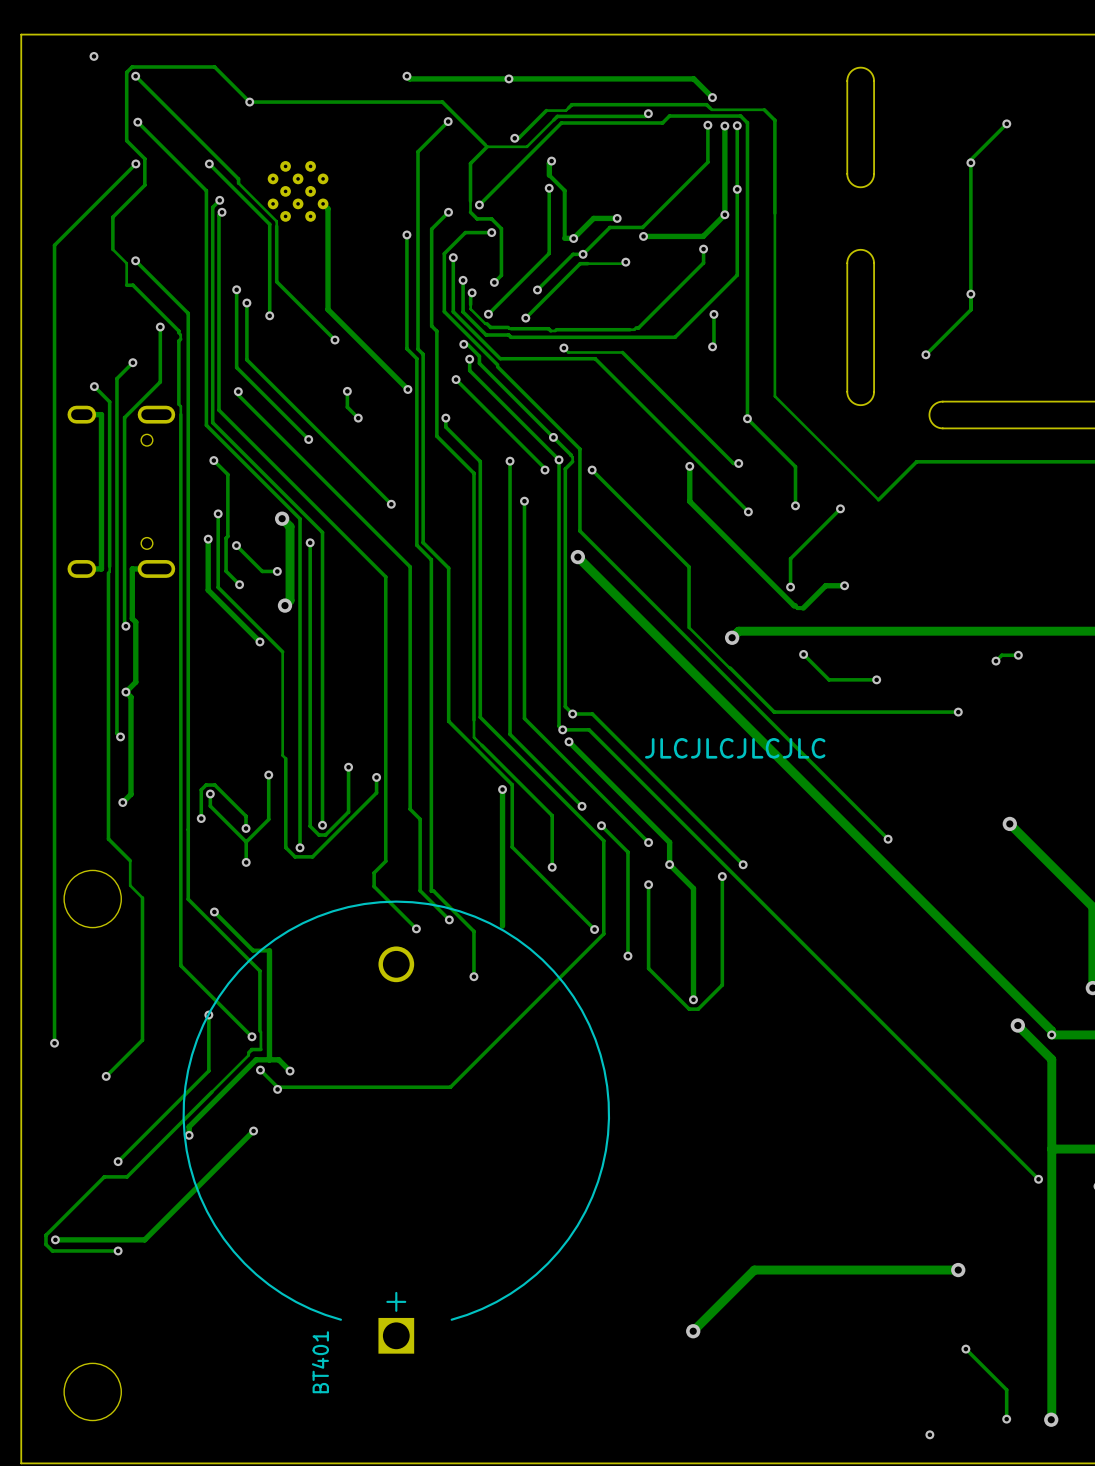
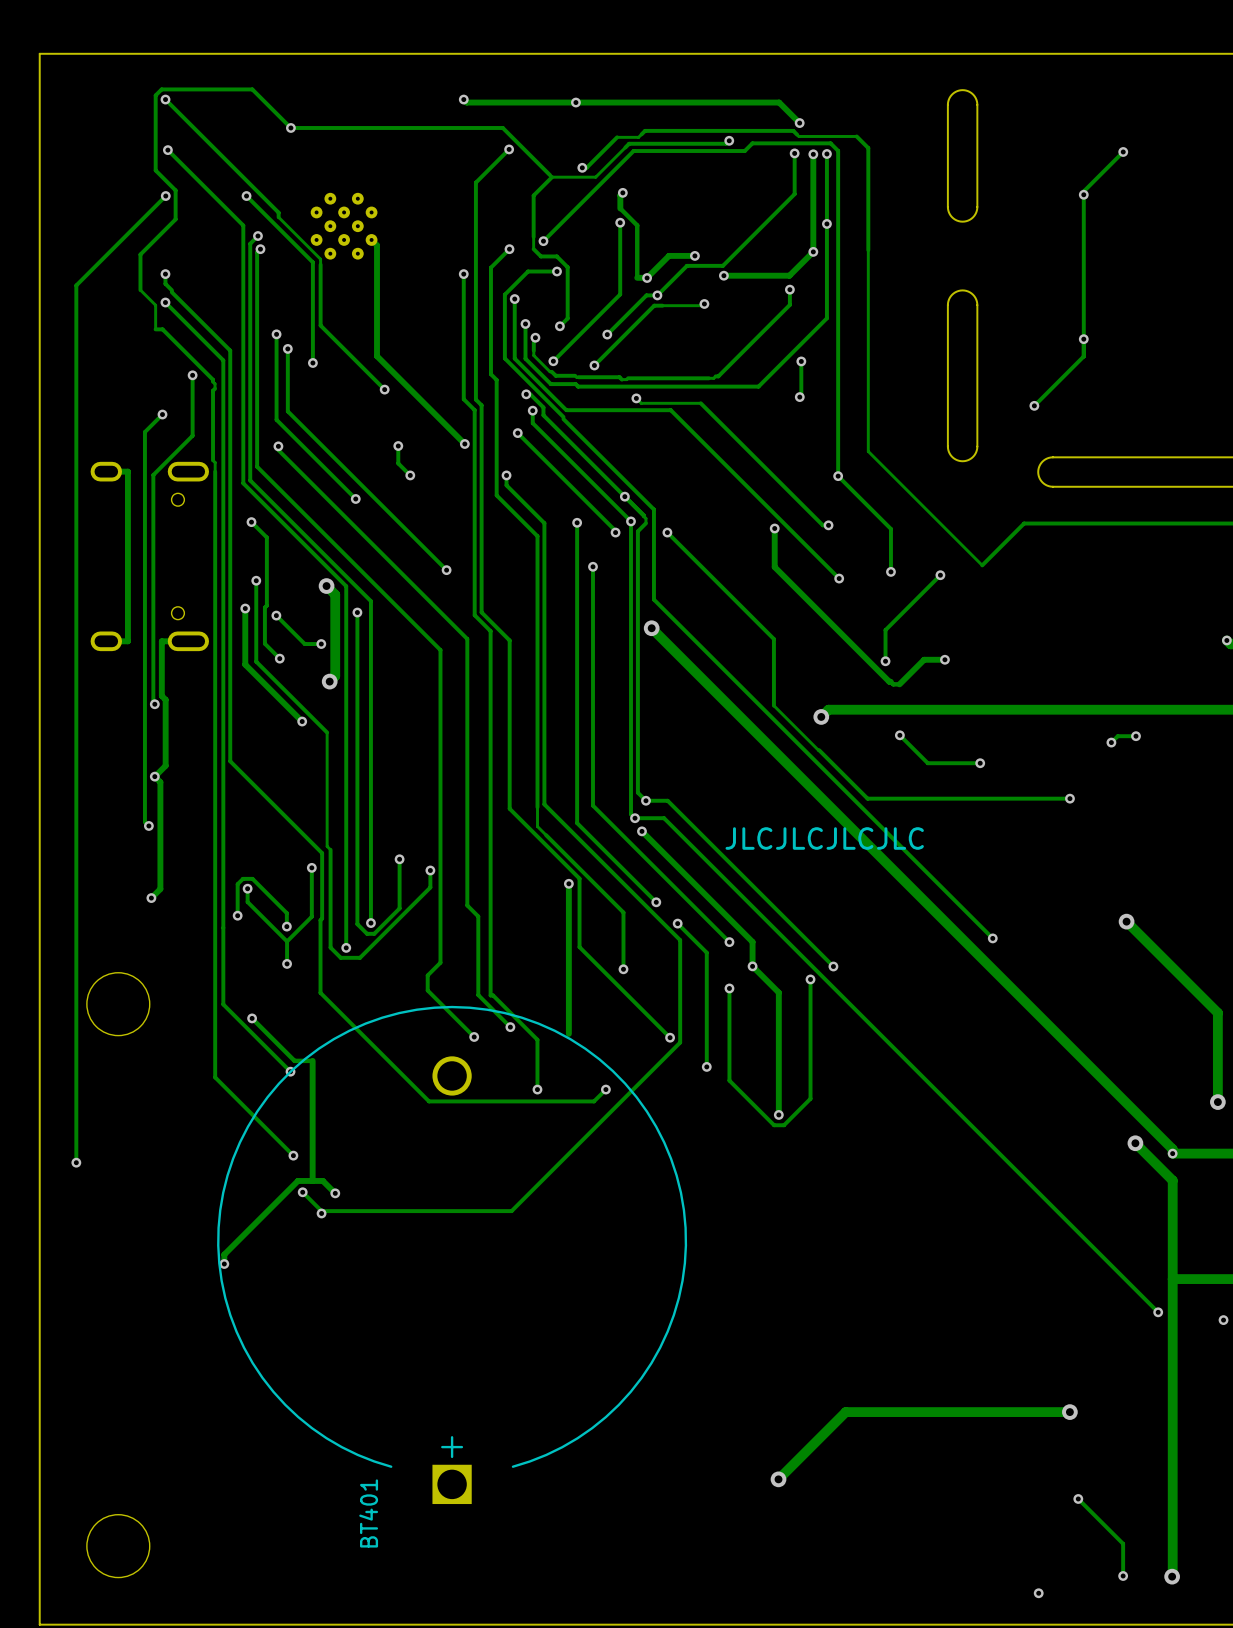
via: (93, 56) -> none
track: none -> (165, 274) (165, 283) (171, 292) (230, 350) (230, 761) (322, 853) (320, 992) (429, 1101) (594, 1101) (605, 1089)
via: none -> (165, 274)
track: (94, 386) (109, 401) (108, 839) (130, 860) (130, 885) (142, 897) (142, 1040) (106, 1076) -> none
via: (94, 386) -> none
track: (249, 960) (259, 970) (260, 1049) (251, 1049) (248, 1055) (127, 1176) (104, 1176) (45, 1235) (45, 1244) (52, 1250) (118, 1250) -> none
via: none -> (605, 1089)
track: (208, 1015) (208, 1070) (118, 1161) -> none
via position: (208, 1015) -> (290, 1071)
via: (106, 1076) -> none
track: (253, 1131) (144, 1239) (55, 1239) -> none
via: (253, 1131) -> none
via: (118, 1161) -> none
via: (55, 1239) -> none
via: (118, 1250) -> none

